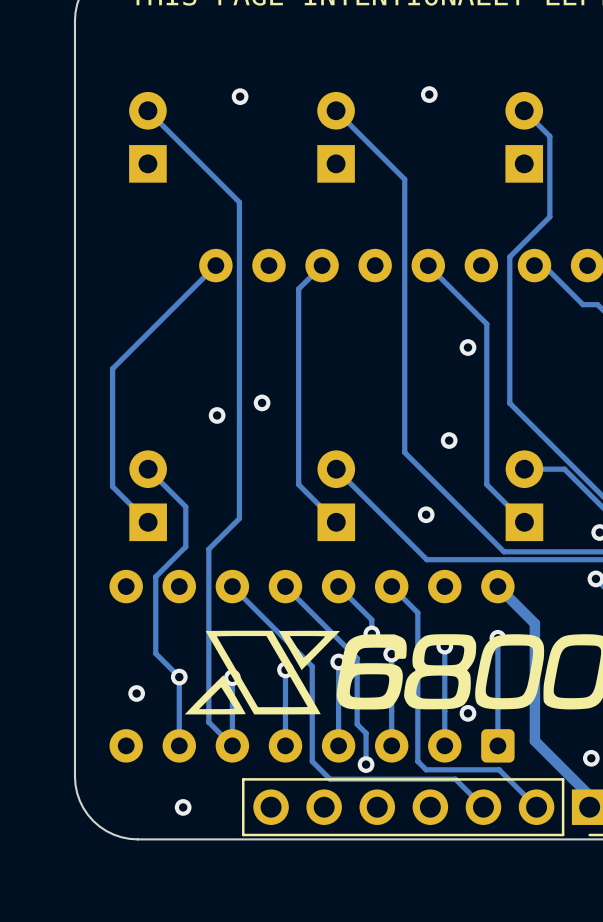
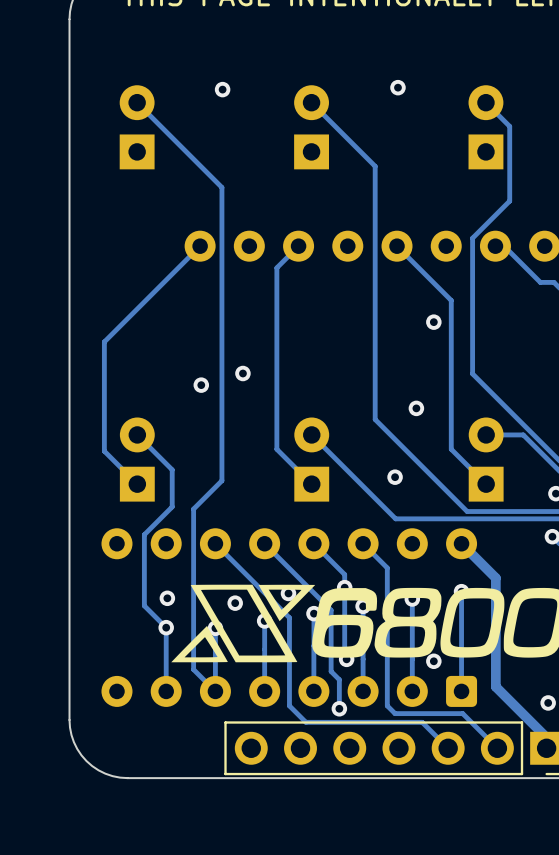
track: none -> (344, 587) (344, 657) (346, 659)
via: none -> (288, 593)
via: none -> (167, 598)
via: none -> (235, 603)
via: (136, 693) -> none
via: none -> (346, 659)
via: (183, 807) -> none

